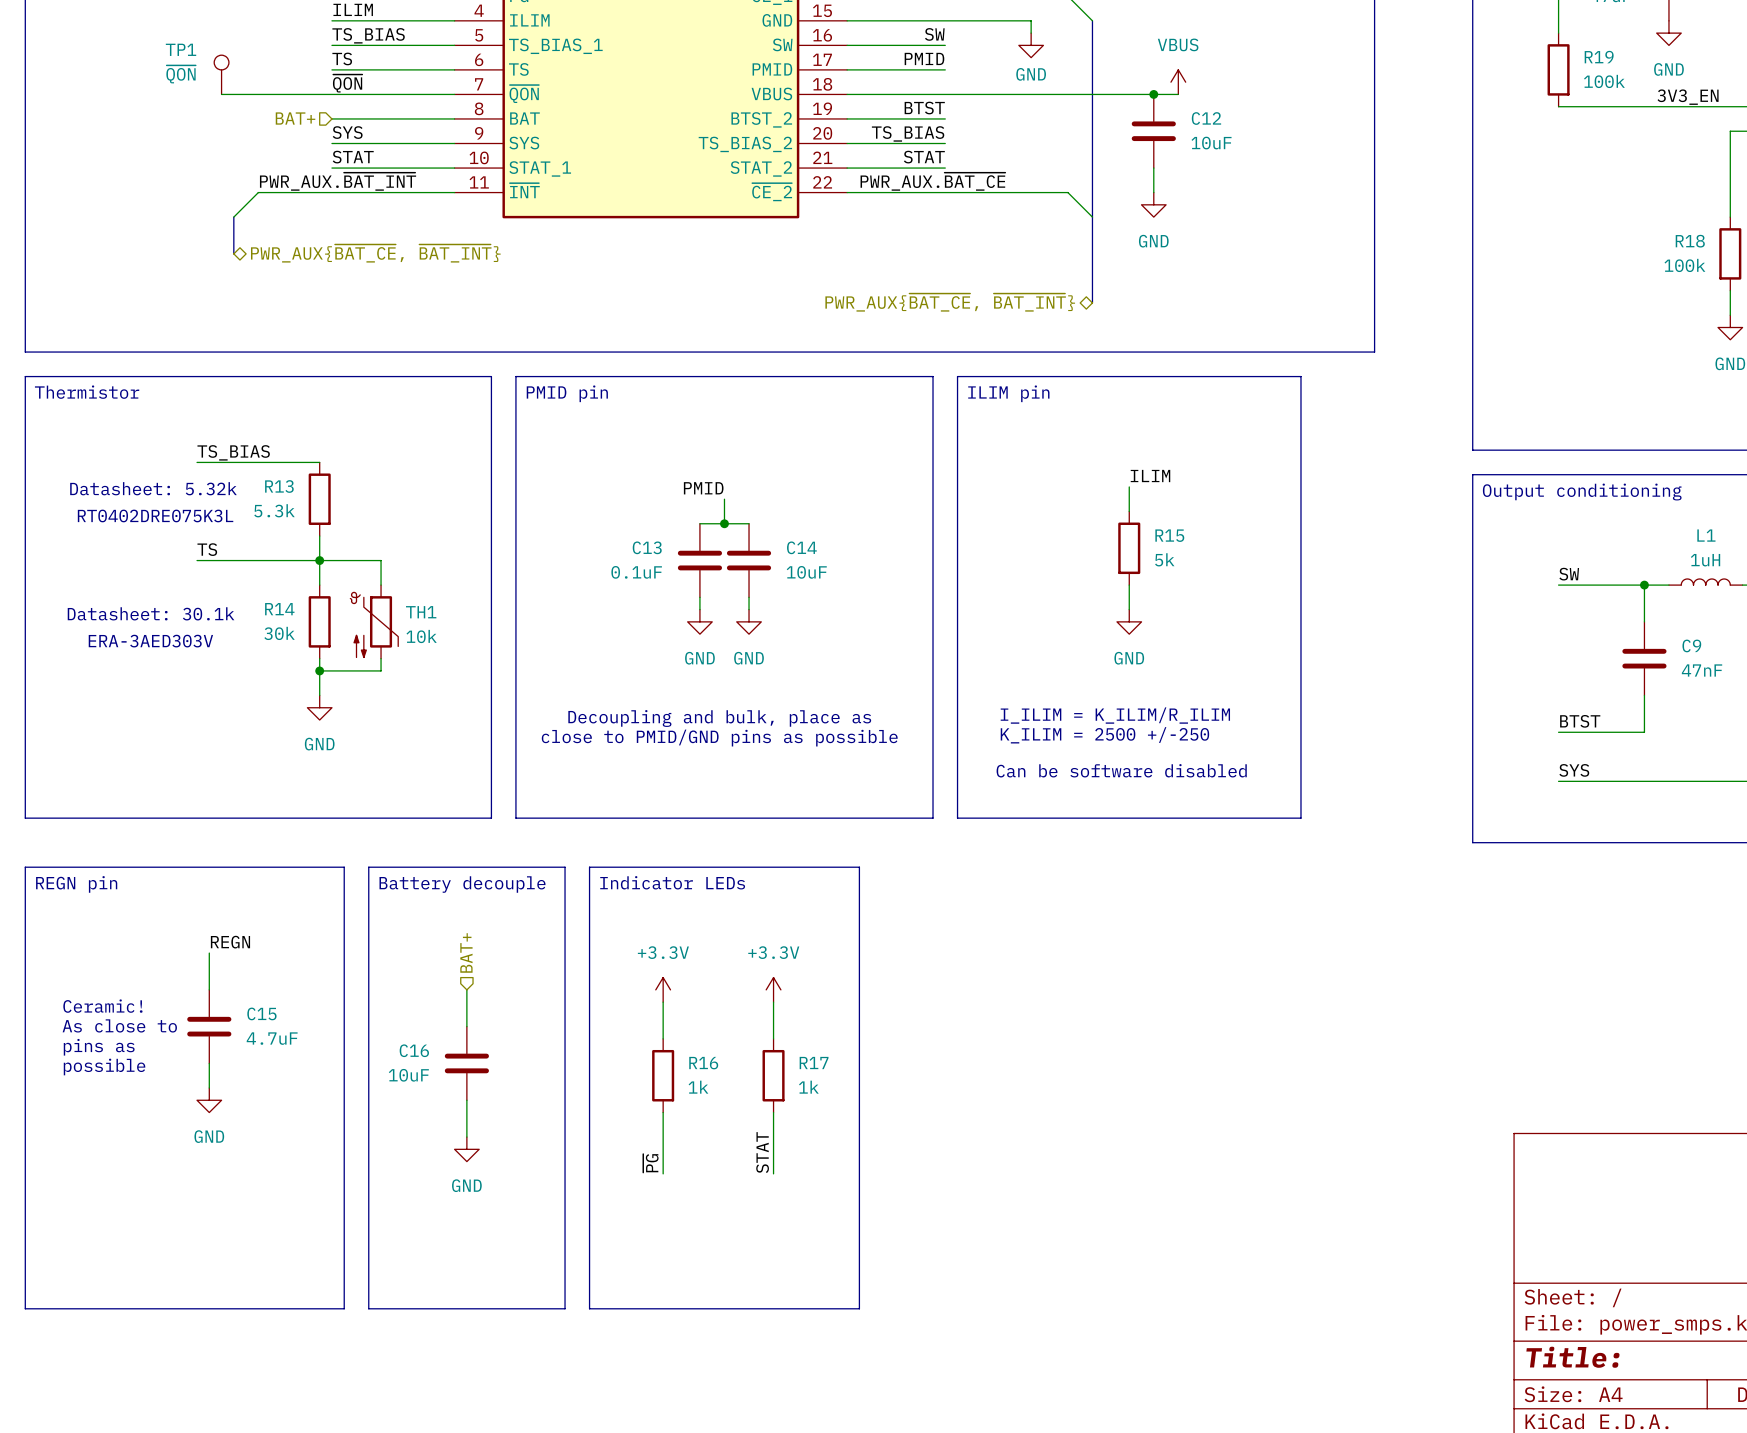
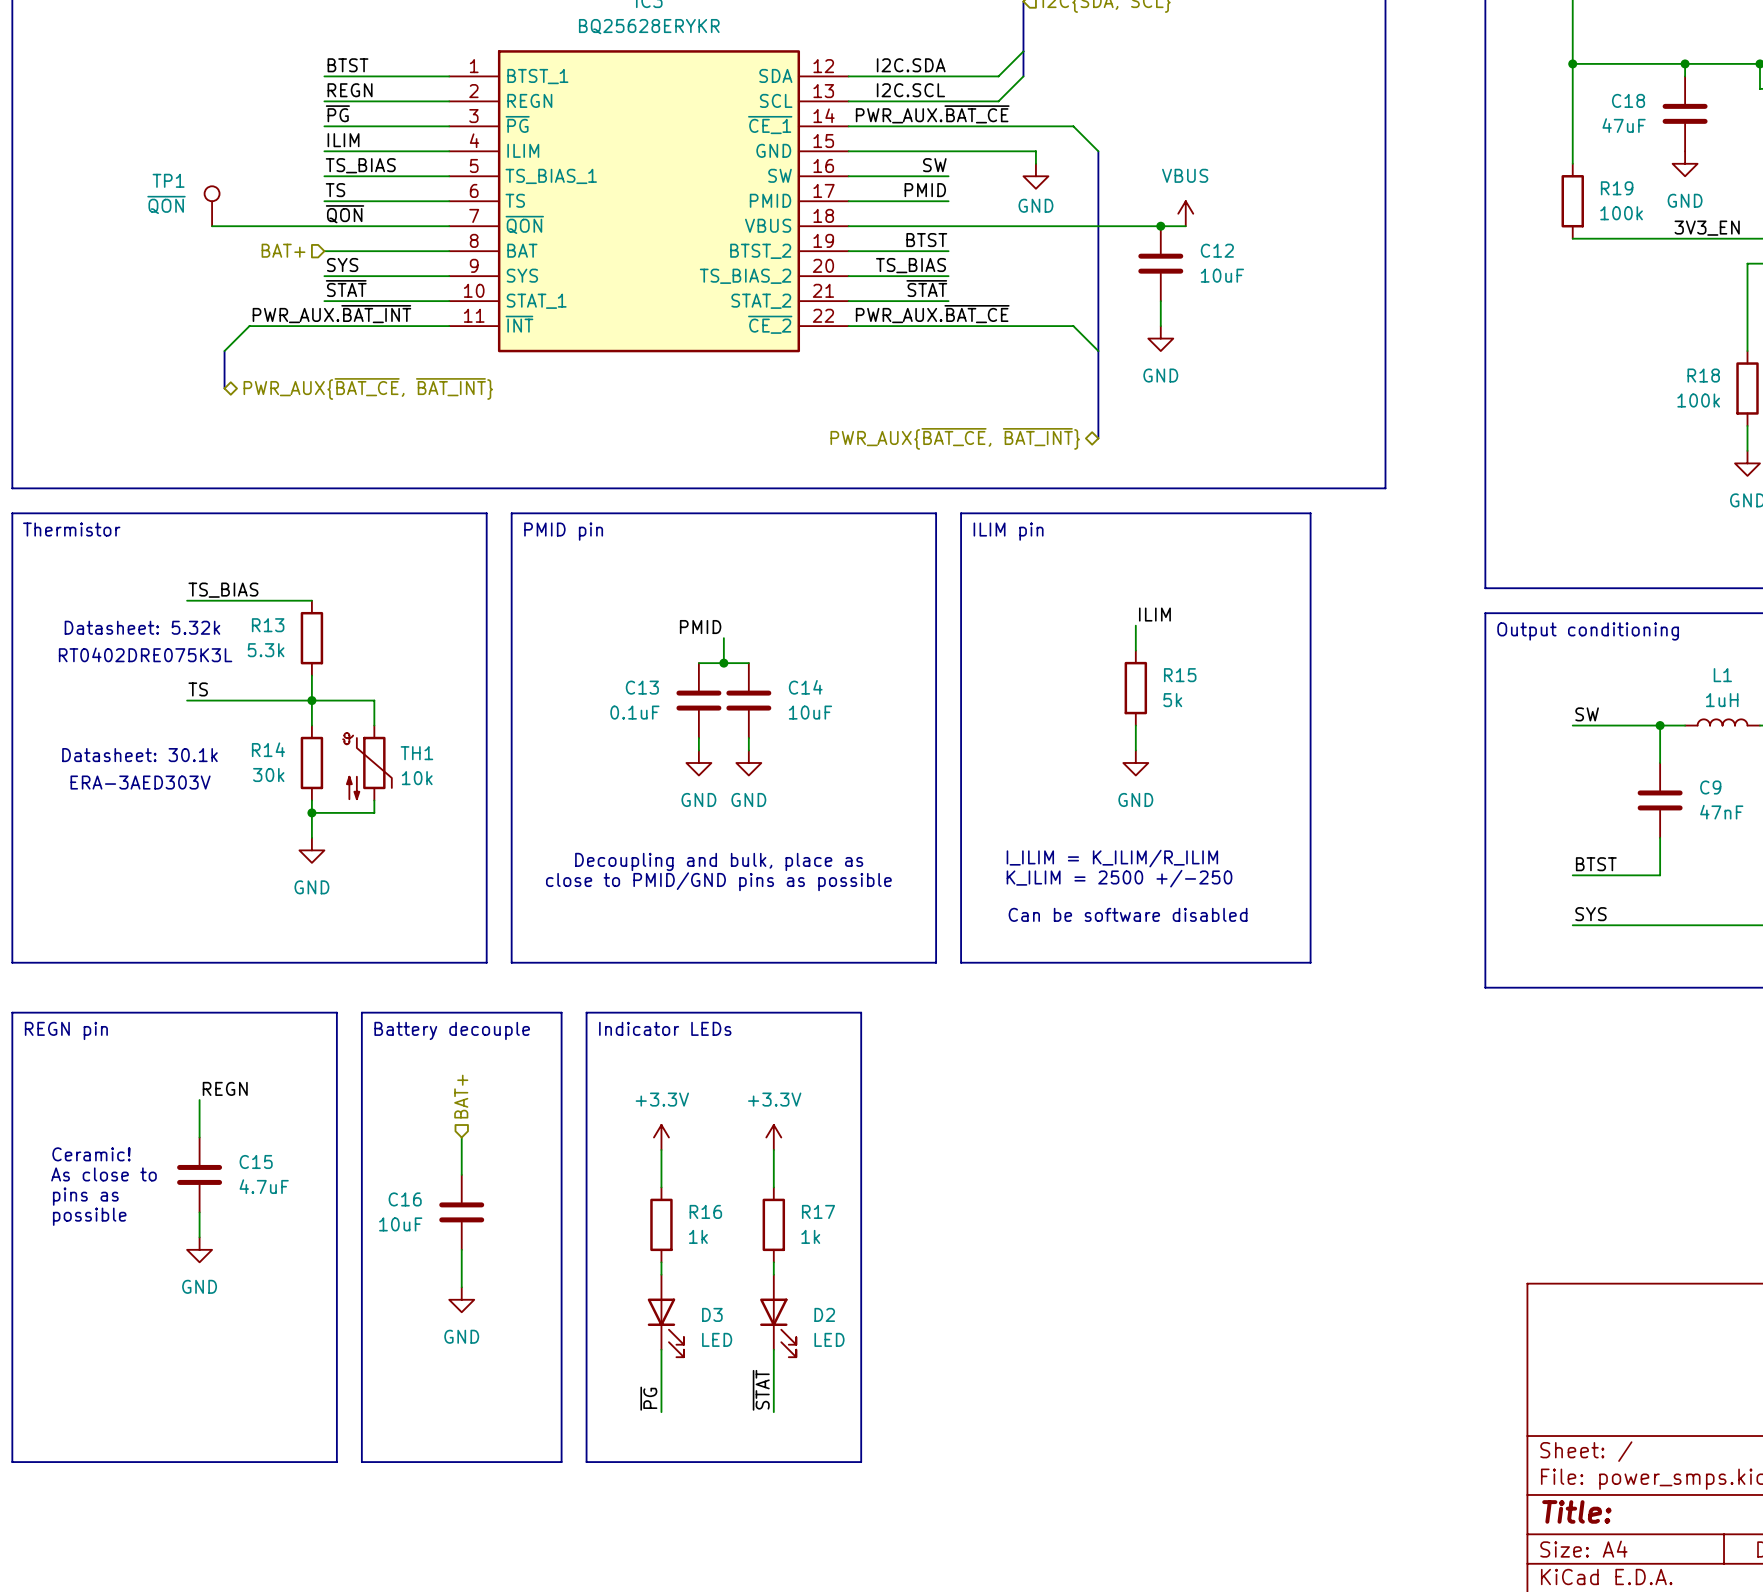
label: STAT (353, 157) -> ~{STAT} (346, 288)
label: STAT (924, 157) -> ~{STAT} (926, 288)
label: STAT (762, 1152) -> ~{STAT} (761, 1390)
label position: ~{PG} (650, 1163) -> ~{PG} (648, 1398)
D3: none -> LED (665, 1316)
D2: none -> LED (778, 1316)
wire: none -> (661, 1349) (661, 1412)
wire: none -> (773, 1349) (773, 1412)

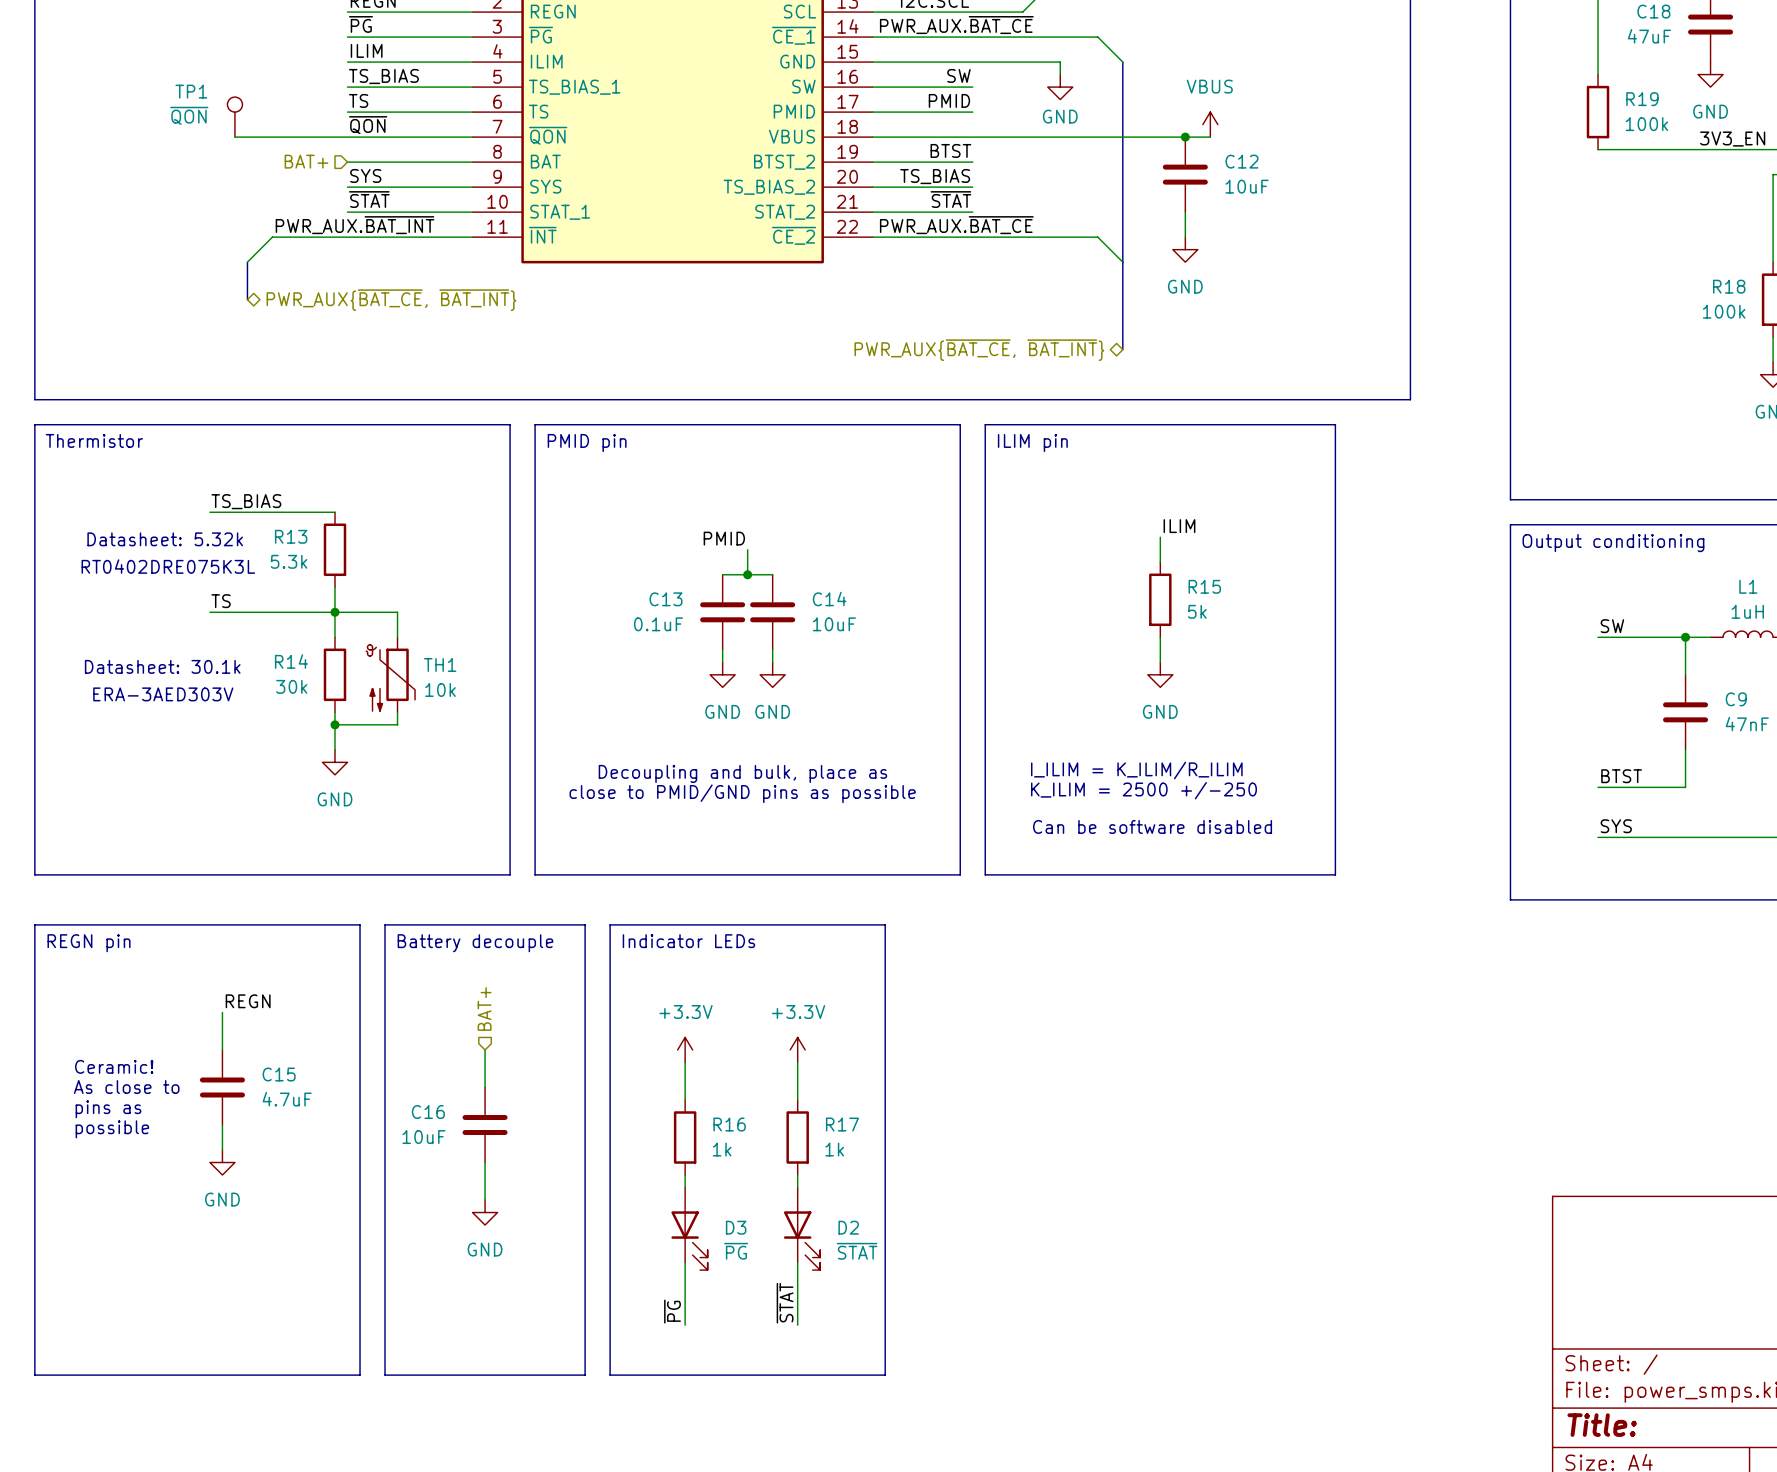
D3 value: LED (717, 1339) -> ~{PG} (736, 1251)
D2 value: LED (829, 1339) -> ~{STAT} (857, 1251)

